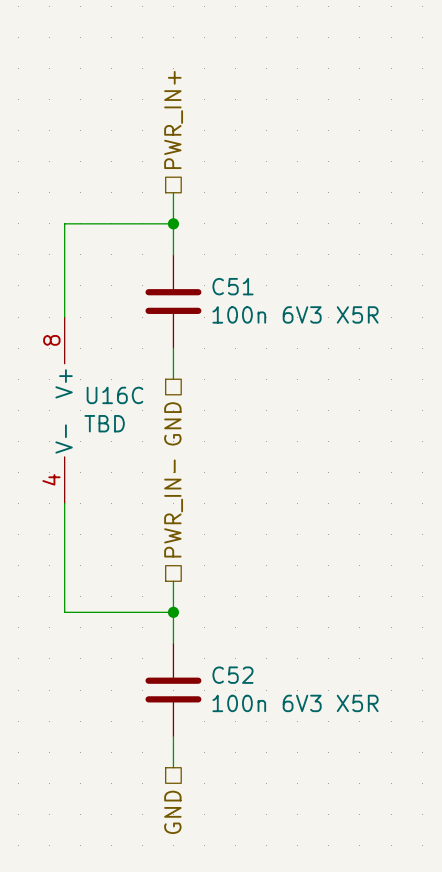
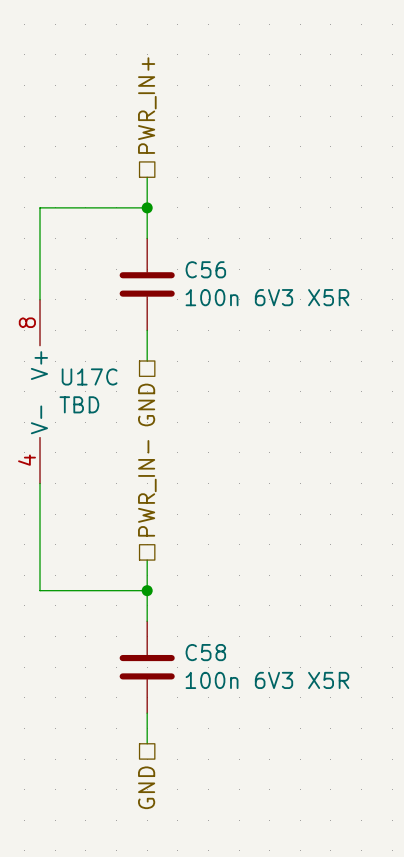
C51 name: C51 (232, 286) -> C56 (205, 269)
U16C name: U16C (114, 395) -> U17C (89, 376)
C52 name: C52 (232, 675) -> C58 (205, 652)

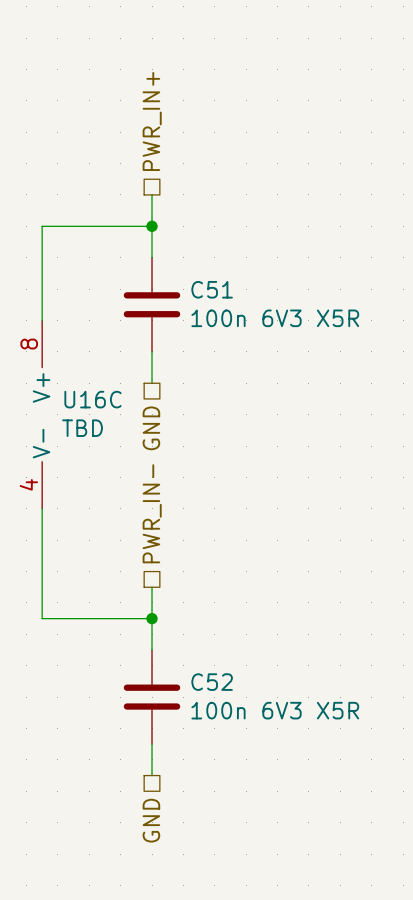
C56 name: C56 (205, 269) -> C51 (212, 289)
U17C name: U17C (89, 376) -> U16C (92, 399)
C58 name: C58 (205, 652) -> C52 (212, 682)

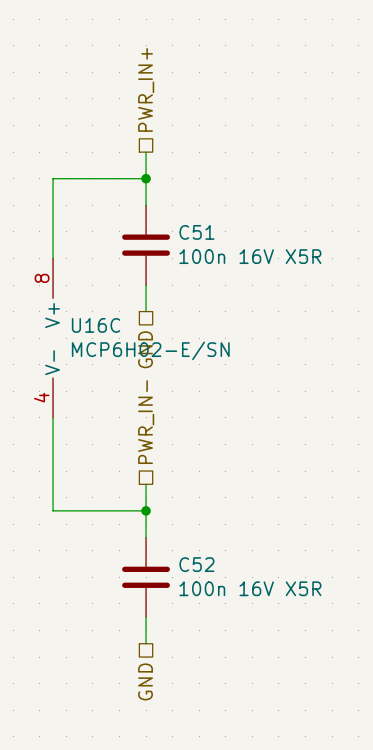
C51 value: 100n 6V3 X5R (275, 318) -> 100n 16V X5R (250, 256)
U16C value: TBD (82, 428) -> MCP6H02-E/SN (150, 350)
C52 value: 100n 6V3 X5R (275, 710) -> 100n 16V X5R (250, 588)

